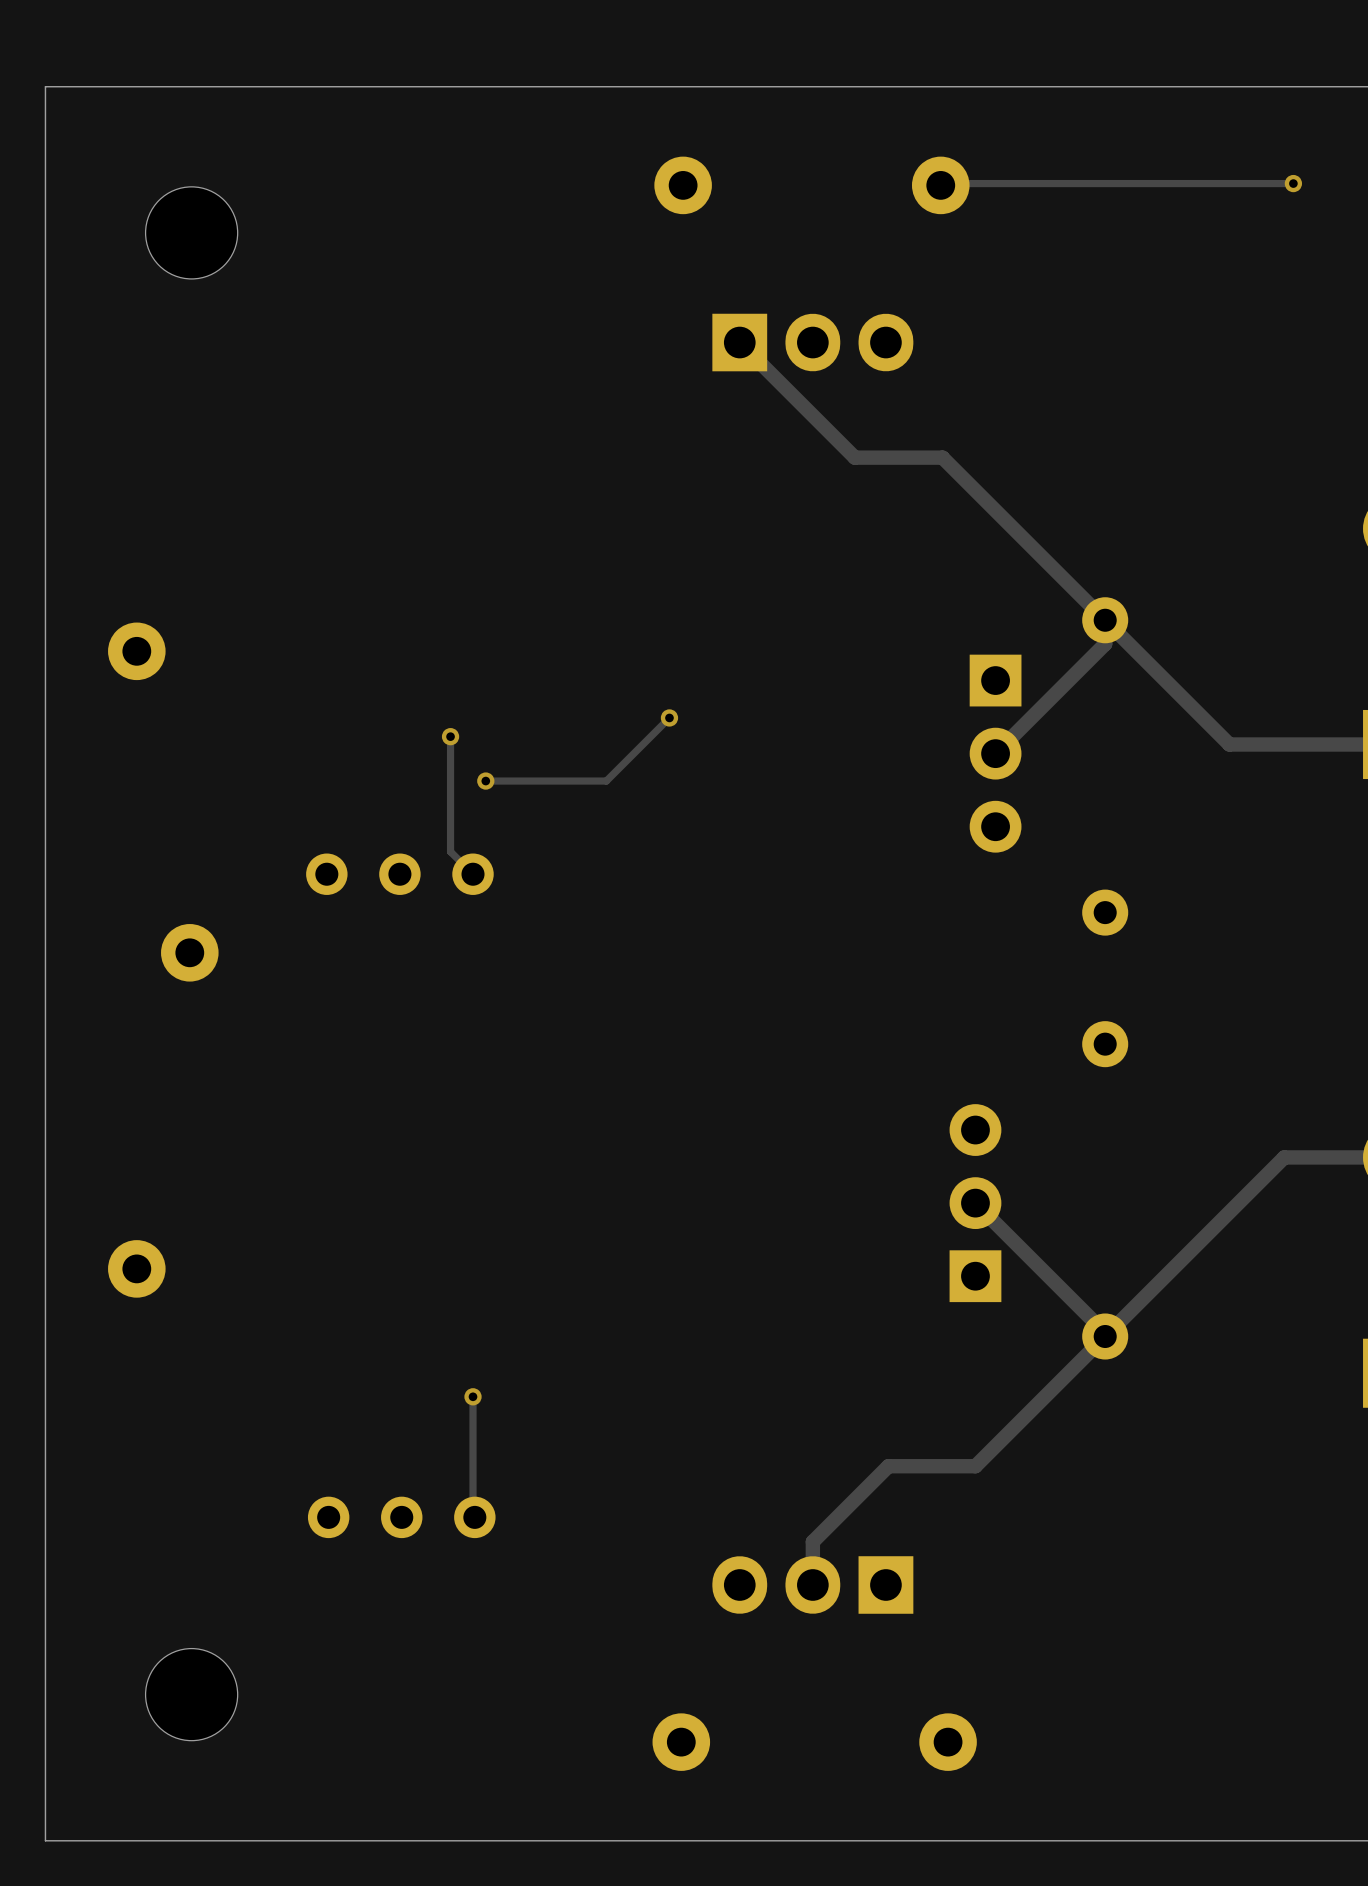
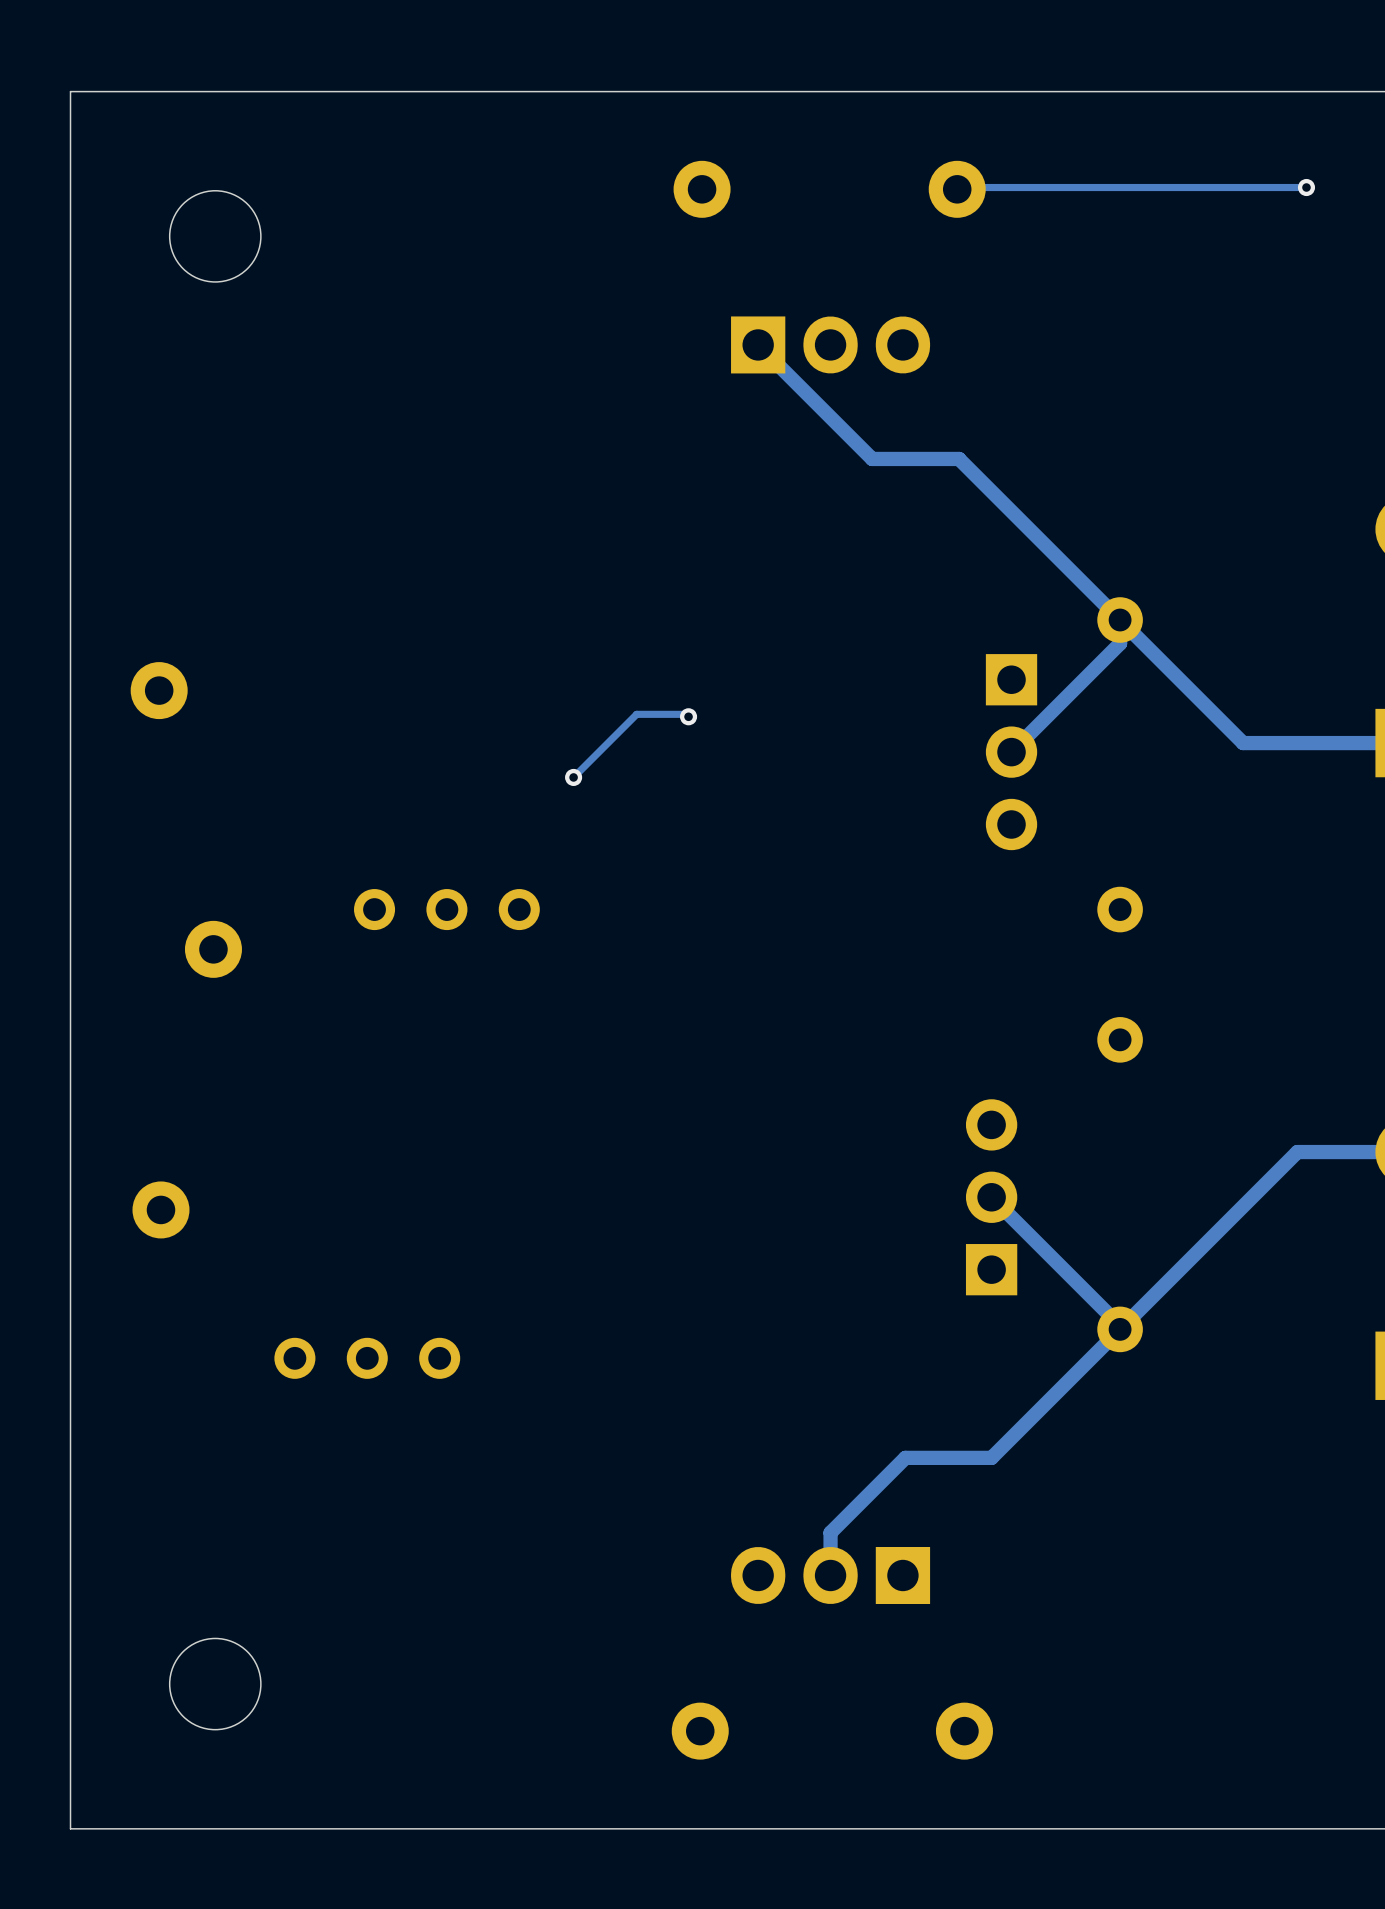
part position: (136, 651) -> (159, 690)
track: none -> (683, 714) (636, 714) (573, 777)
track: (669, 717) (606, 781) (485, 781) -> none
track: (450, 736) (450, 851) (473, 874) -> none
via: (450, 736) -> none
via: none -> (573, 777)
via: (485, 781) -> none
part position: (399, 874) -> (446, 909)
part position: (136, 1268) -> (160, 1209)
track: (473, 1396) (473, 1515) (474, 1517) -> none
via: (473, 1396) -> none
part position: (401, 1517) -> (367, 1358)

